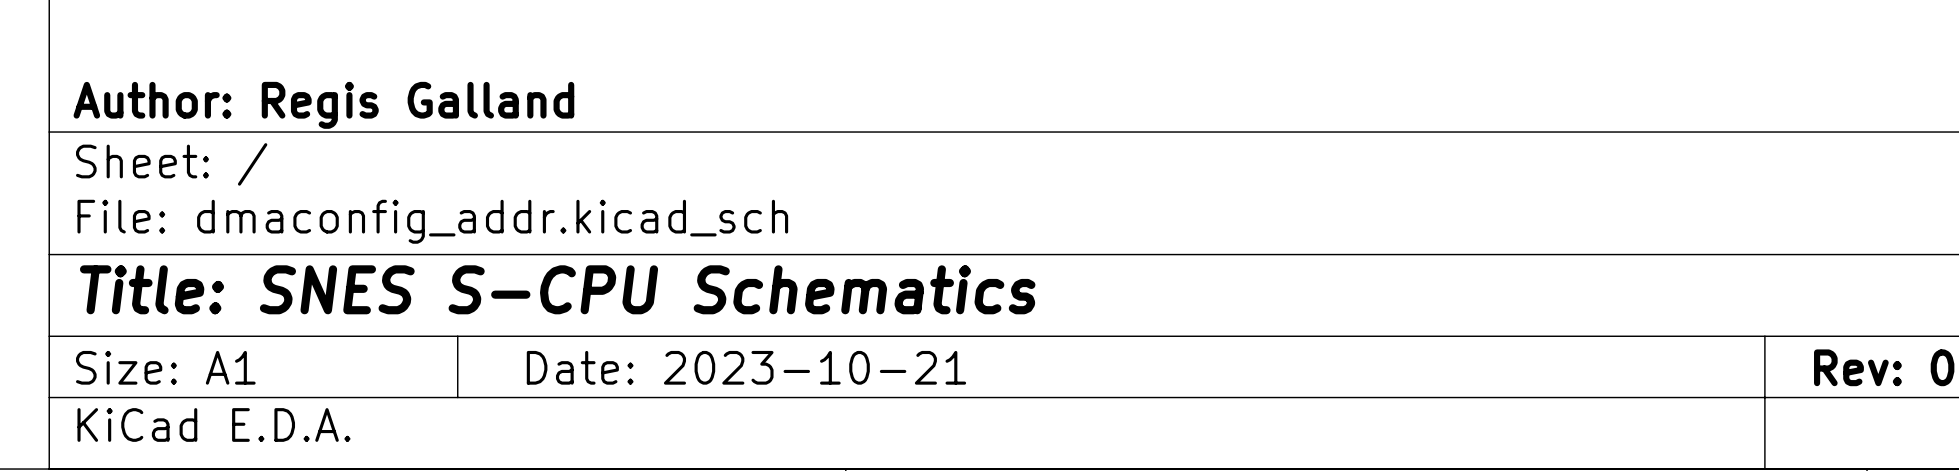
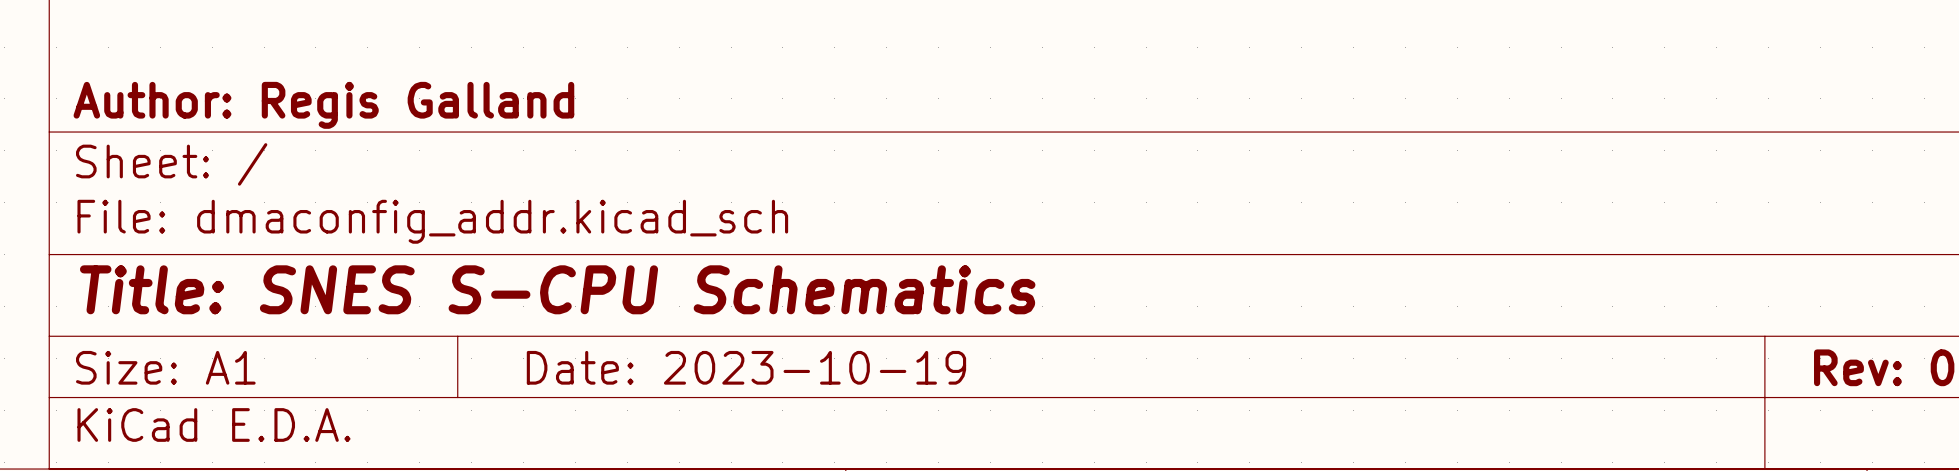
title block: Date: 2023-10-21 (746, 367) -> Date: 2023-10-19 (746, 367)

